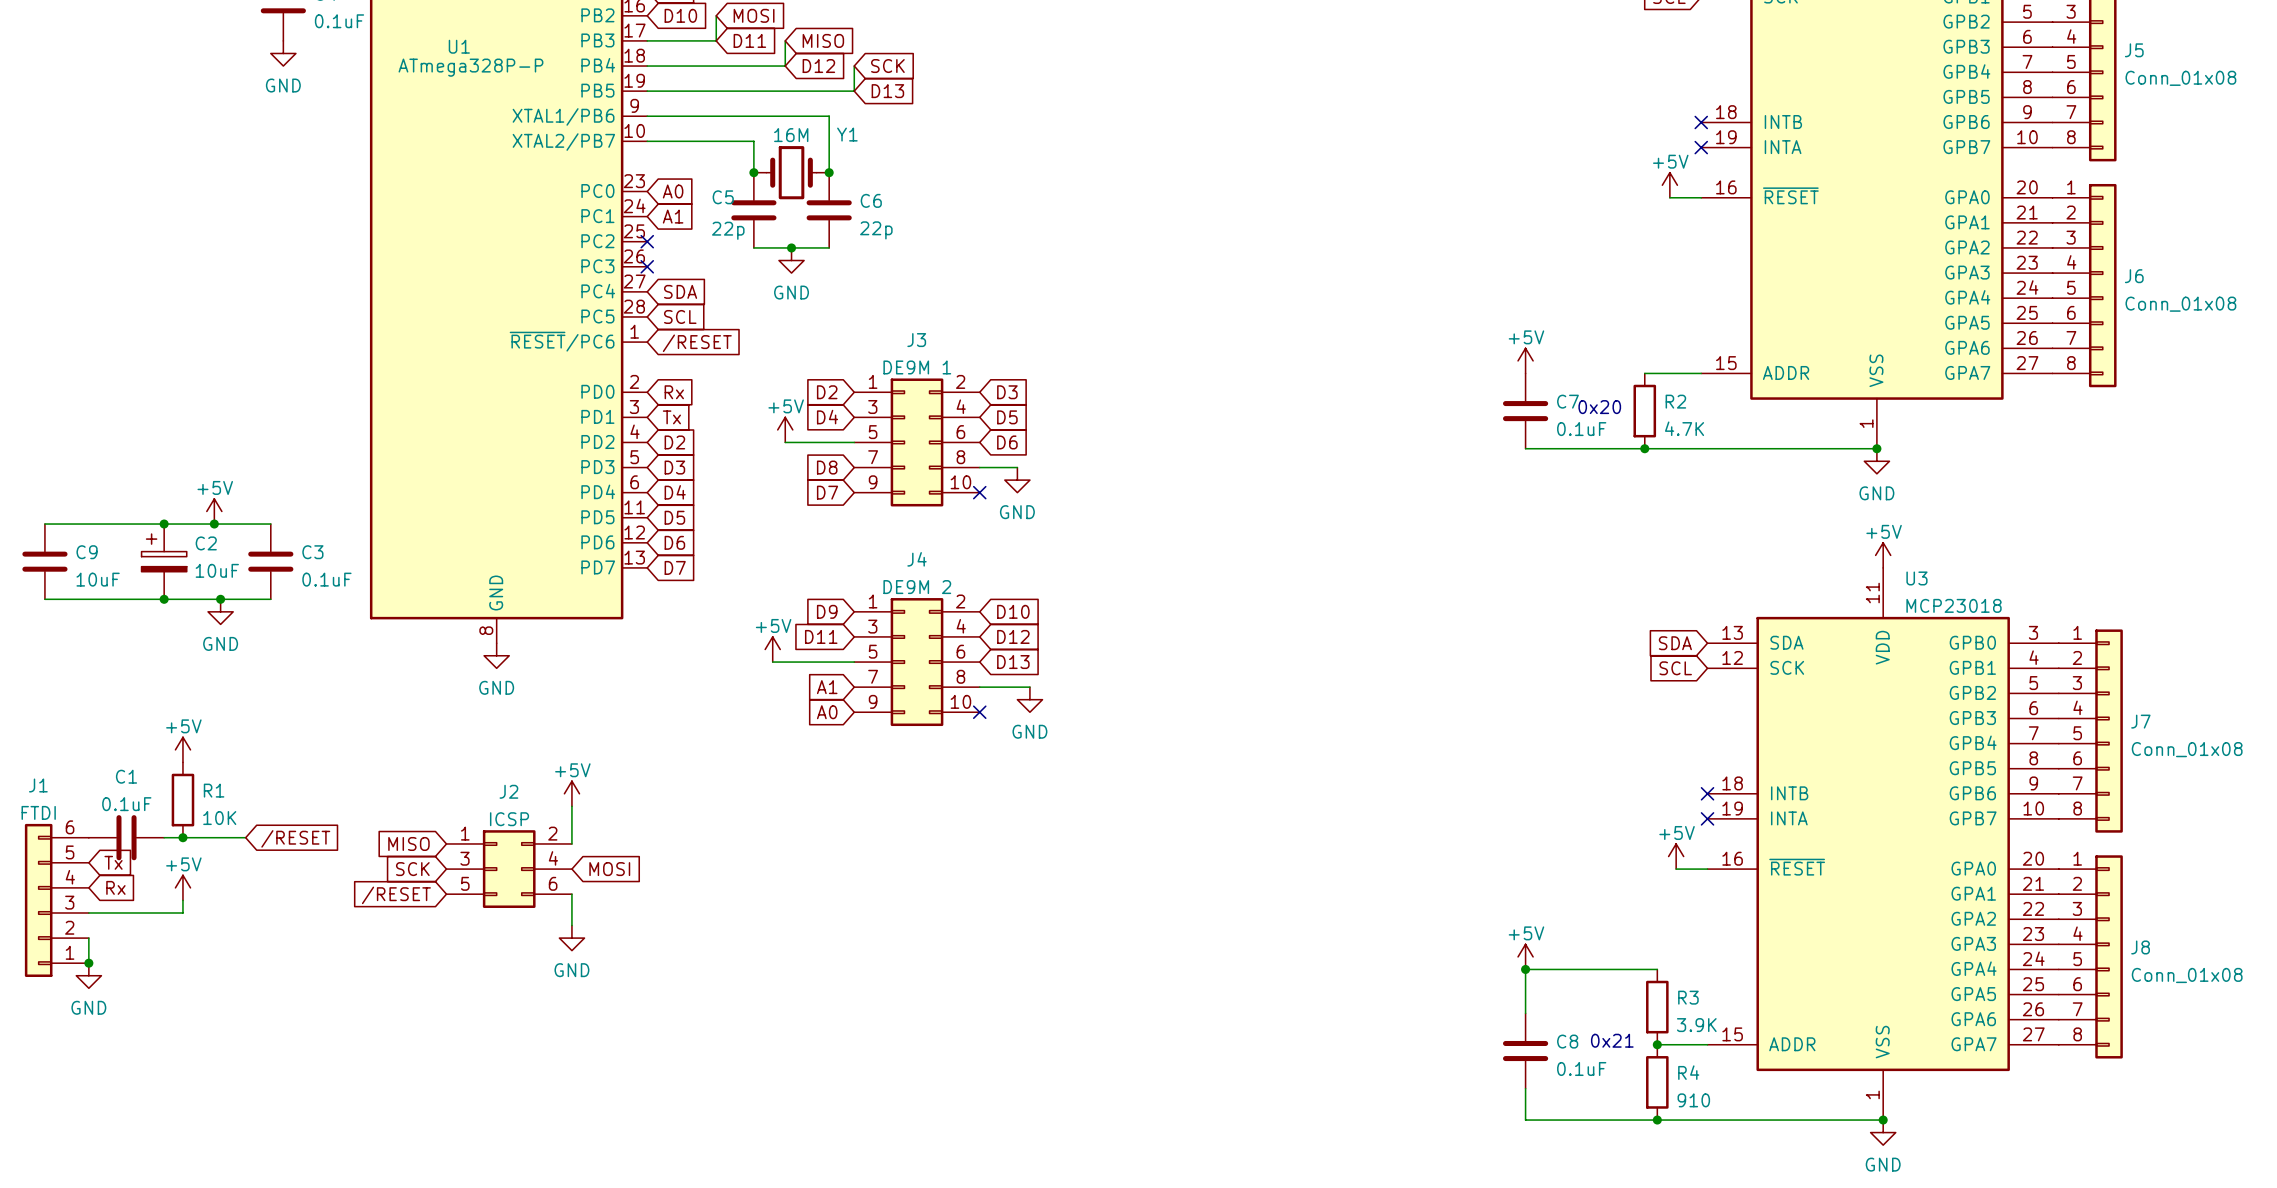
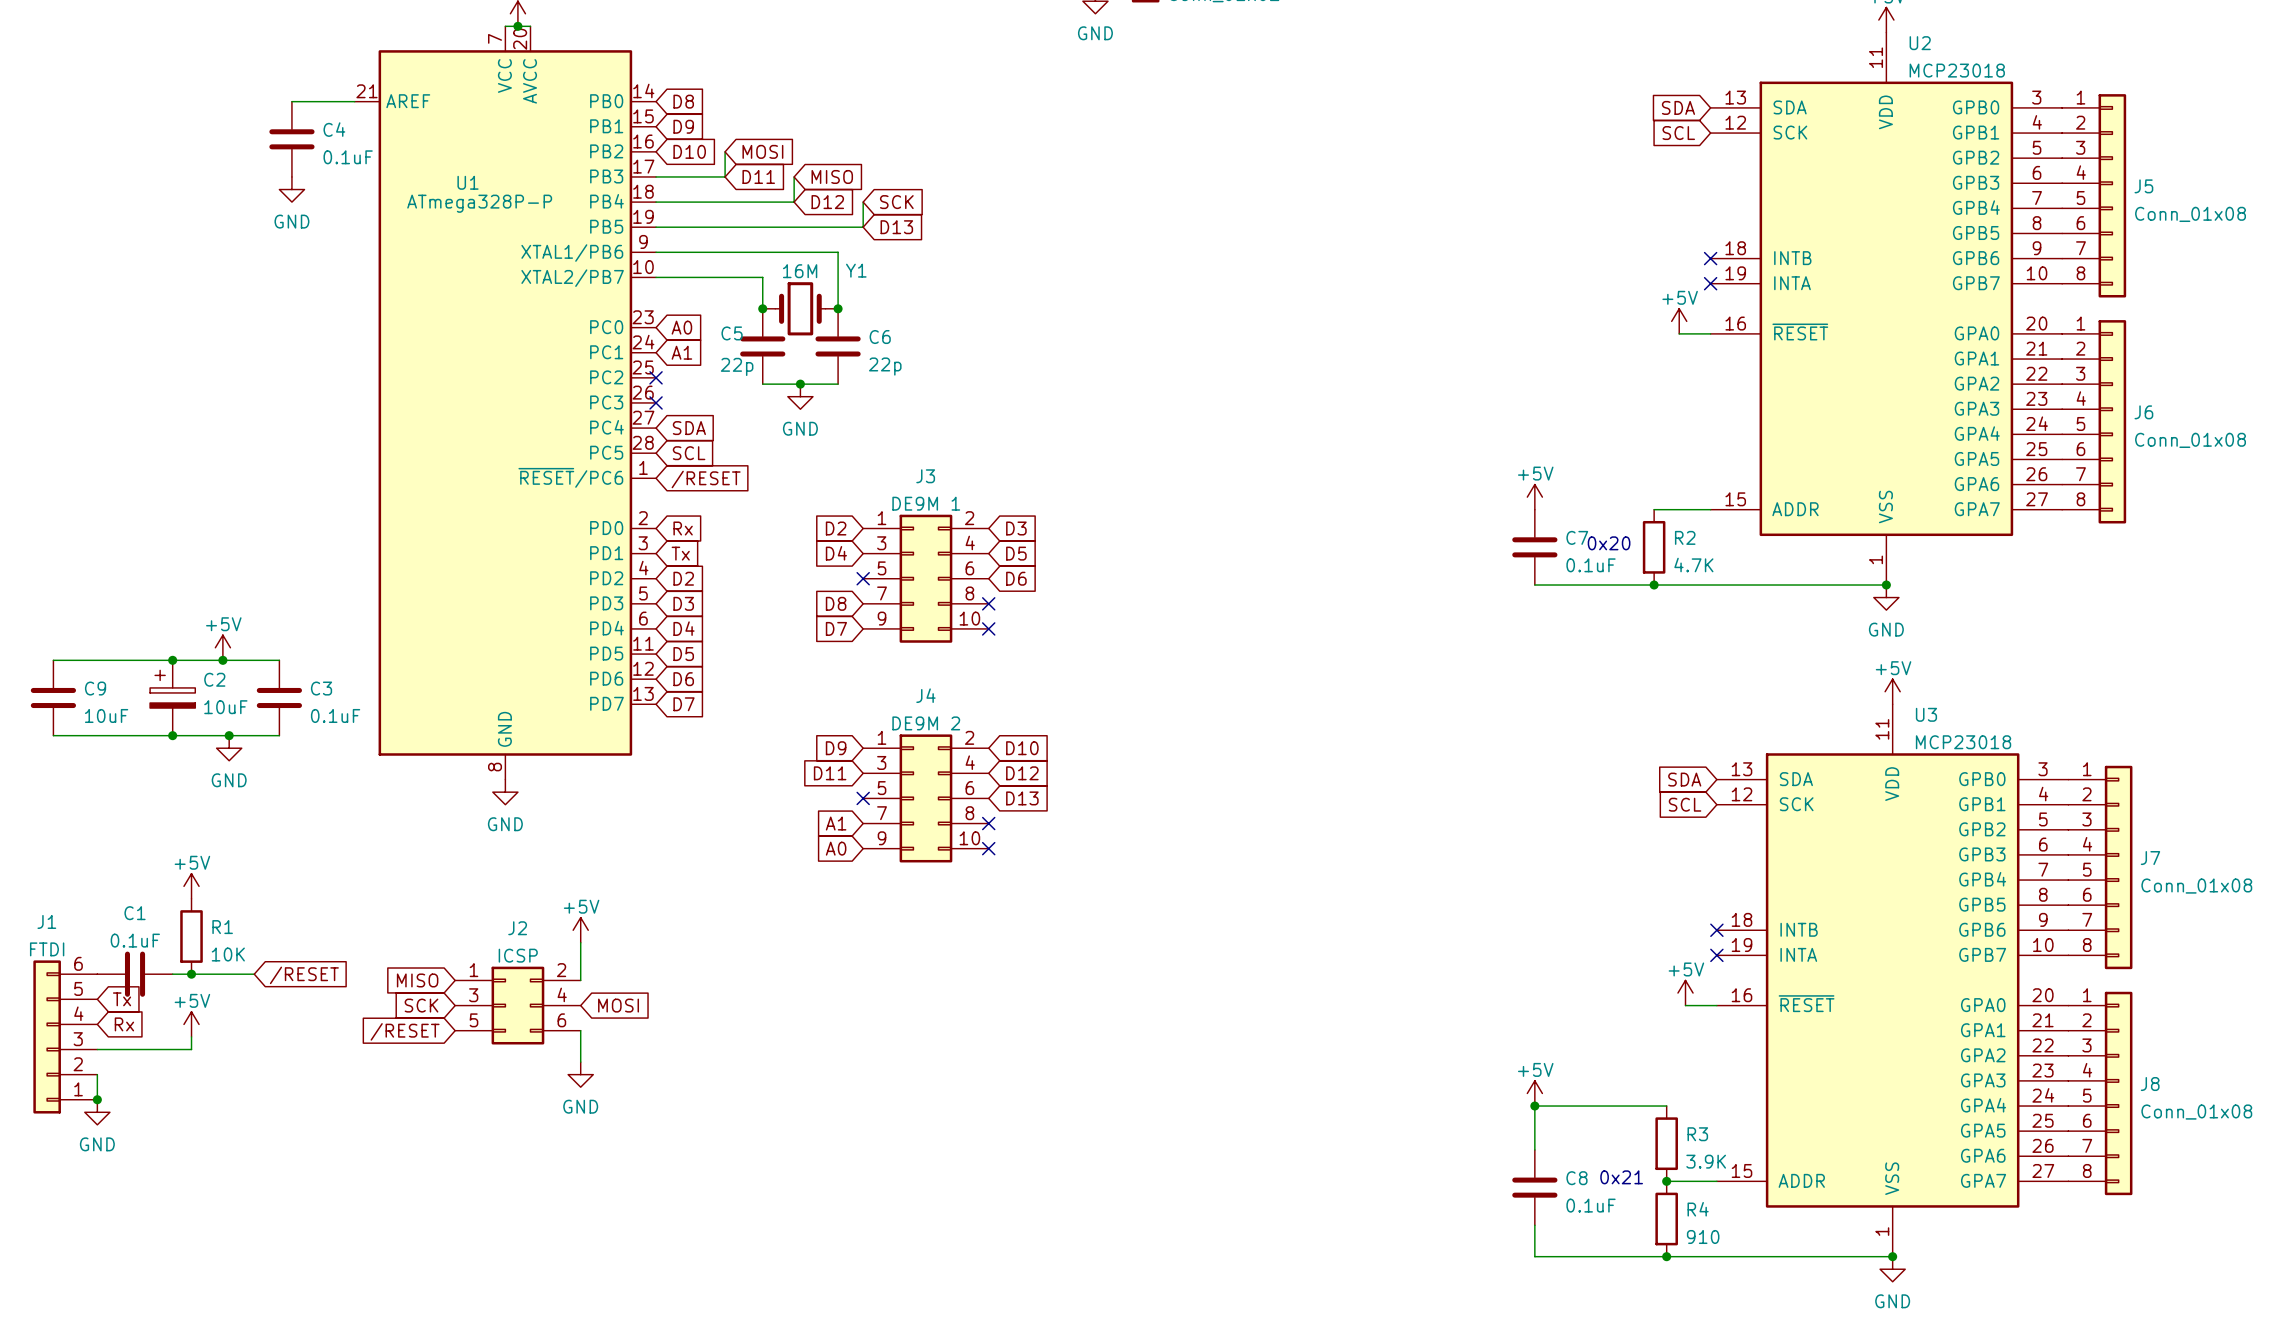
power symbol: +5V (785, 429) -> none
wire: (785, 442) (854, 442) -> none
no-connect mark: none -> (863, 578)
wire: (979, 467) (1017, 467) -> none
no-connect mark: none -> (988, 603)
power symbol: GND (1017, 480) -> none
power symbol: +5V (772, 649) -> none
wire: (772, 662) (854, 662) -> none
no-connect mark: none -> (863, 798)
wire: (979, 687) (1029, 687) -> none
no-connect mark: none -> (988, 823)
power symbol: GND (1029, 699) -> none

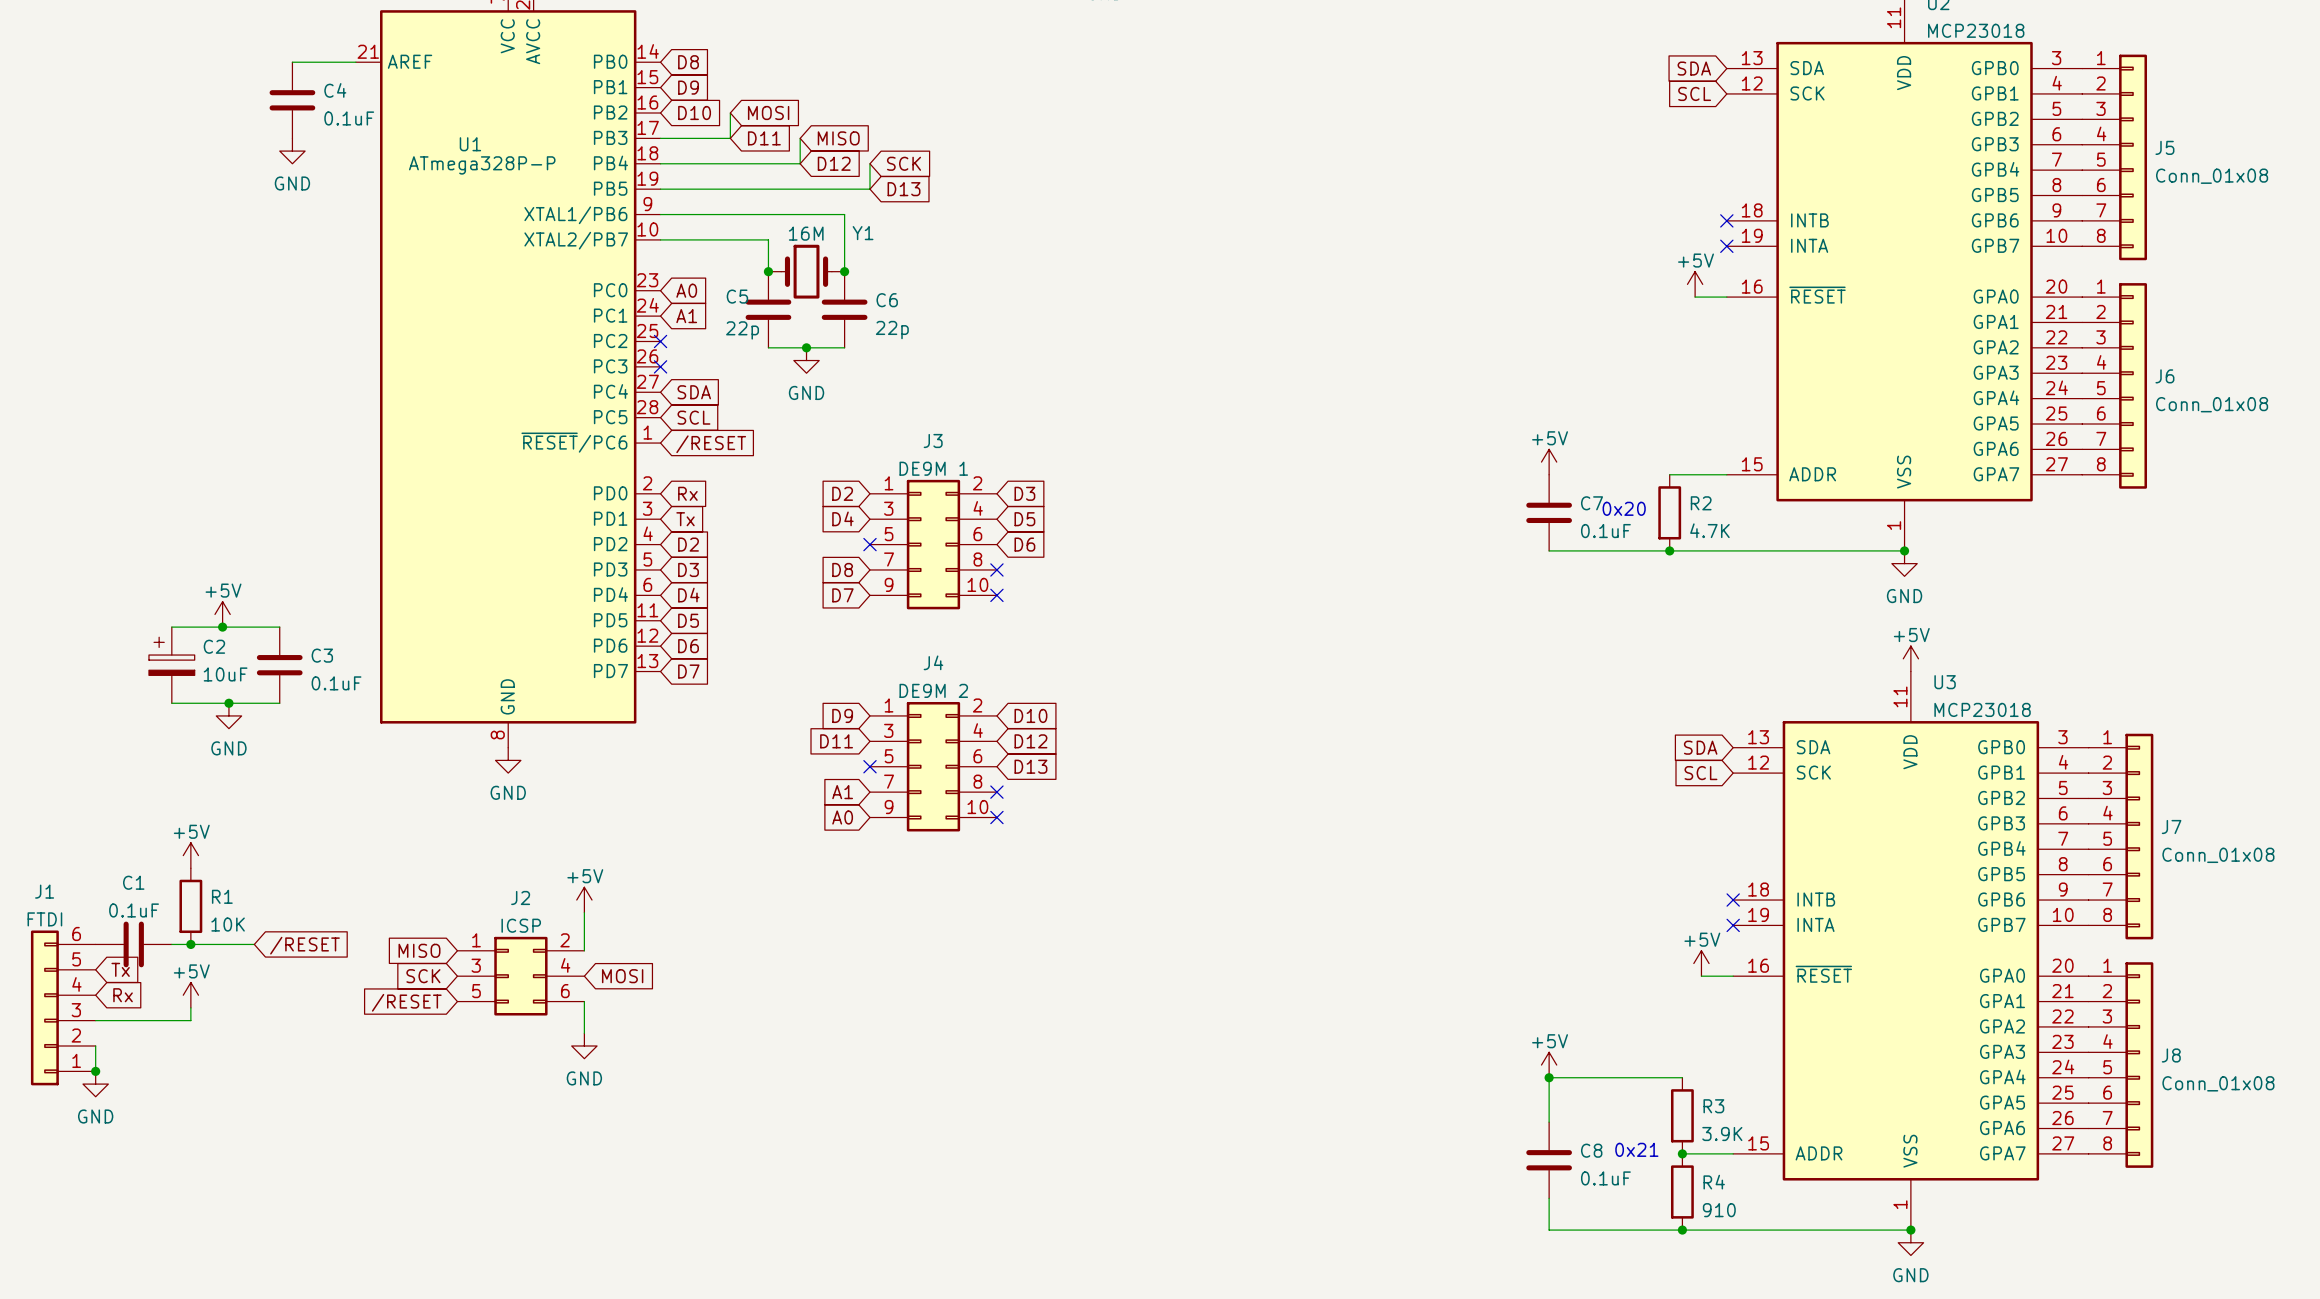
wire: (53, 660) (172, 660) -> none
junction: (172, 660) -> none
C9: 10uF (53, 697) -> none
wire: (53, 735) (172, 735) -> none
junction: (172, 735) -> none

